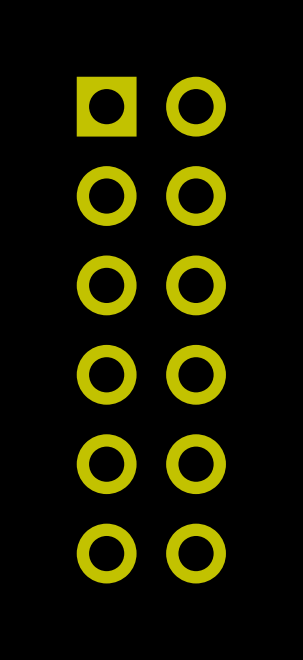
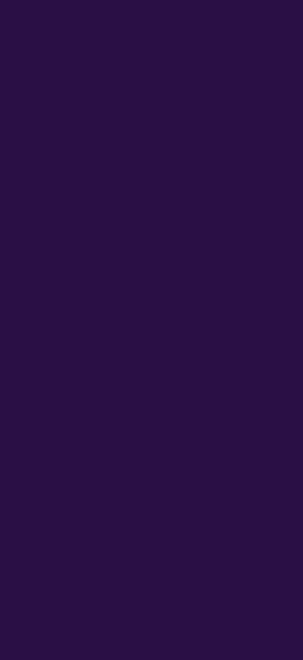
part: (151, 330) -> none

